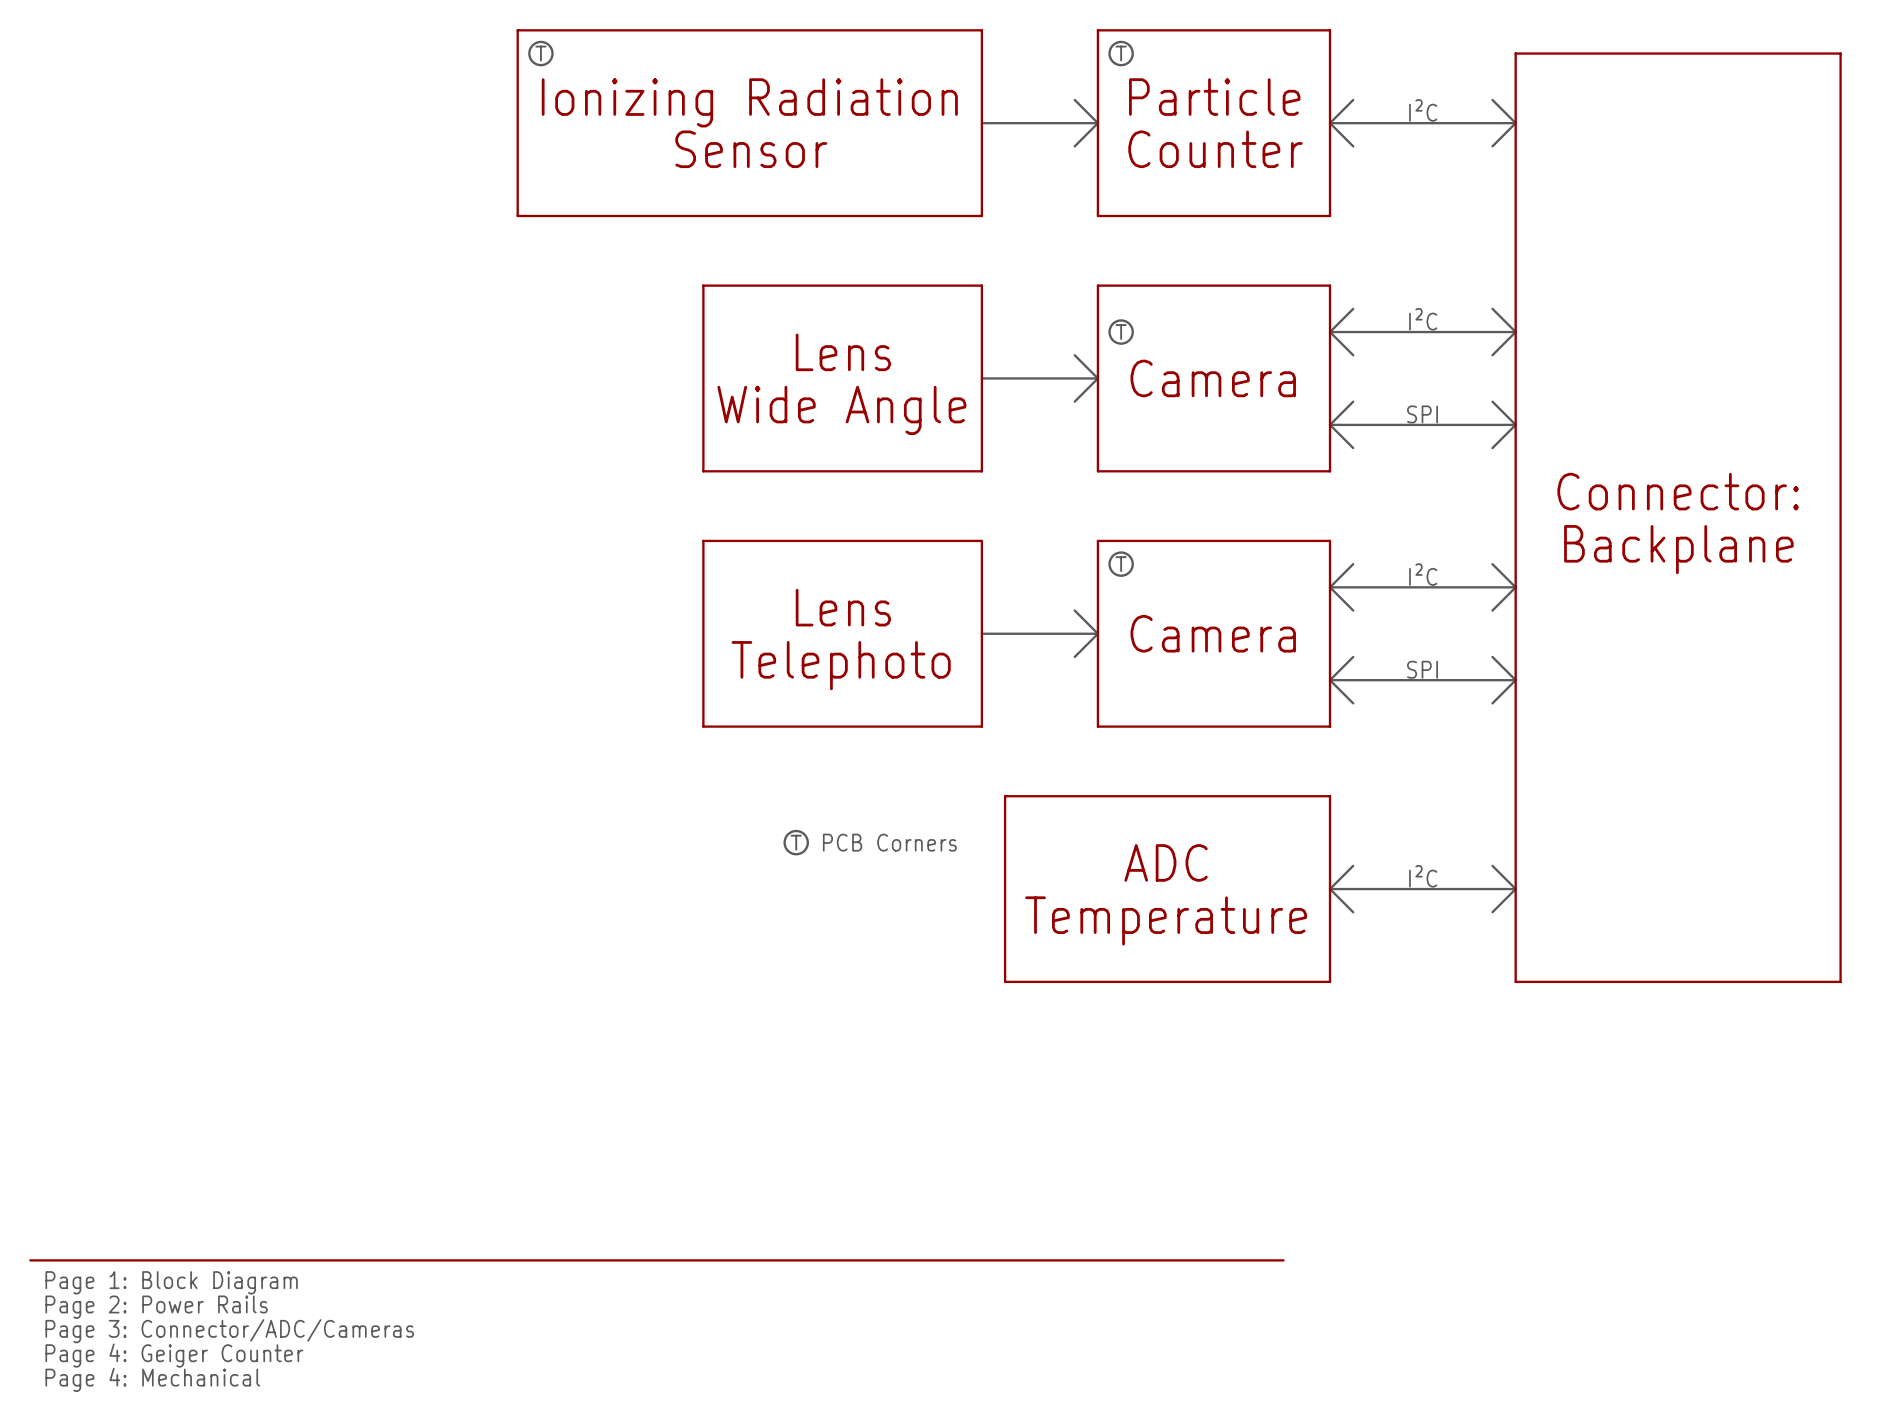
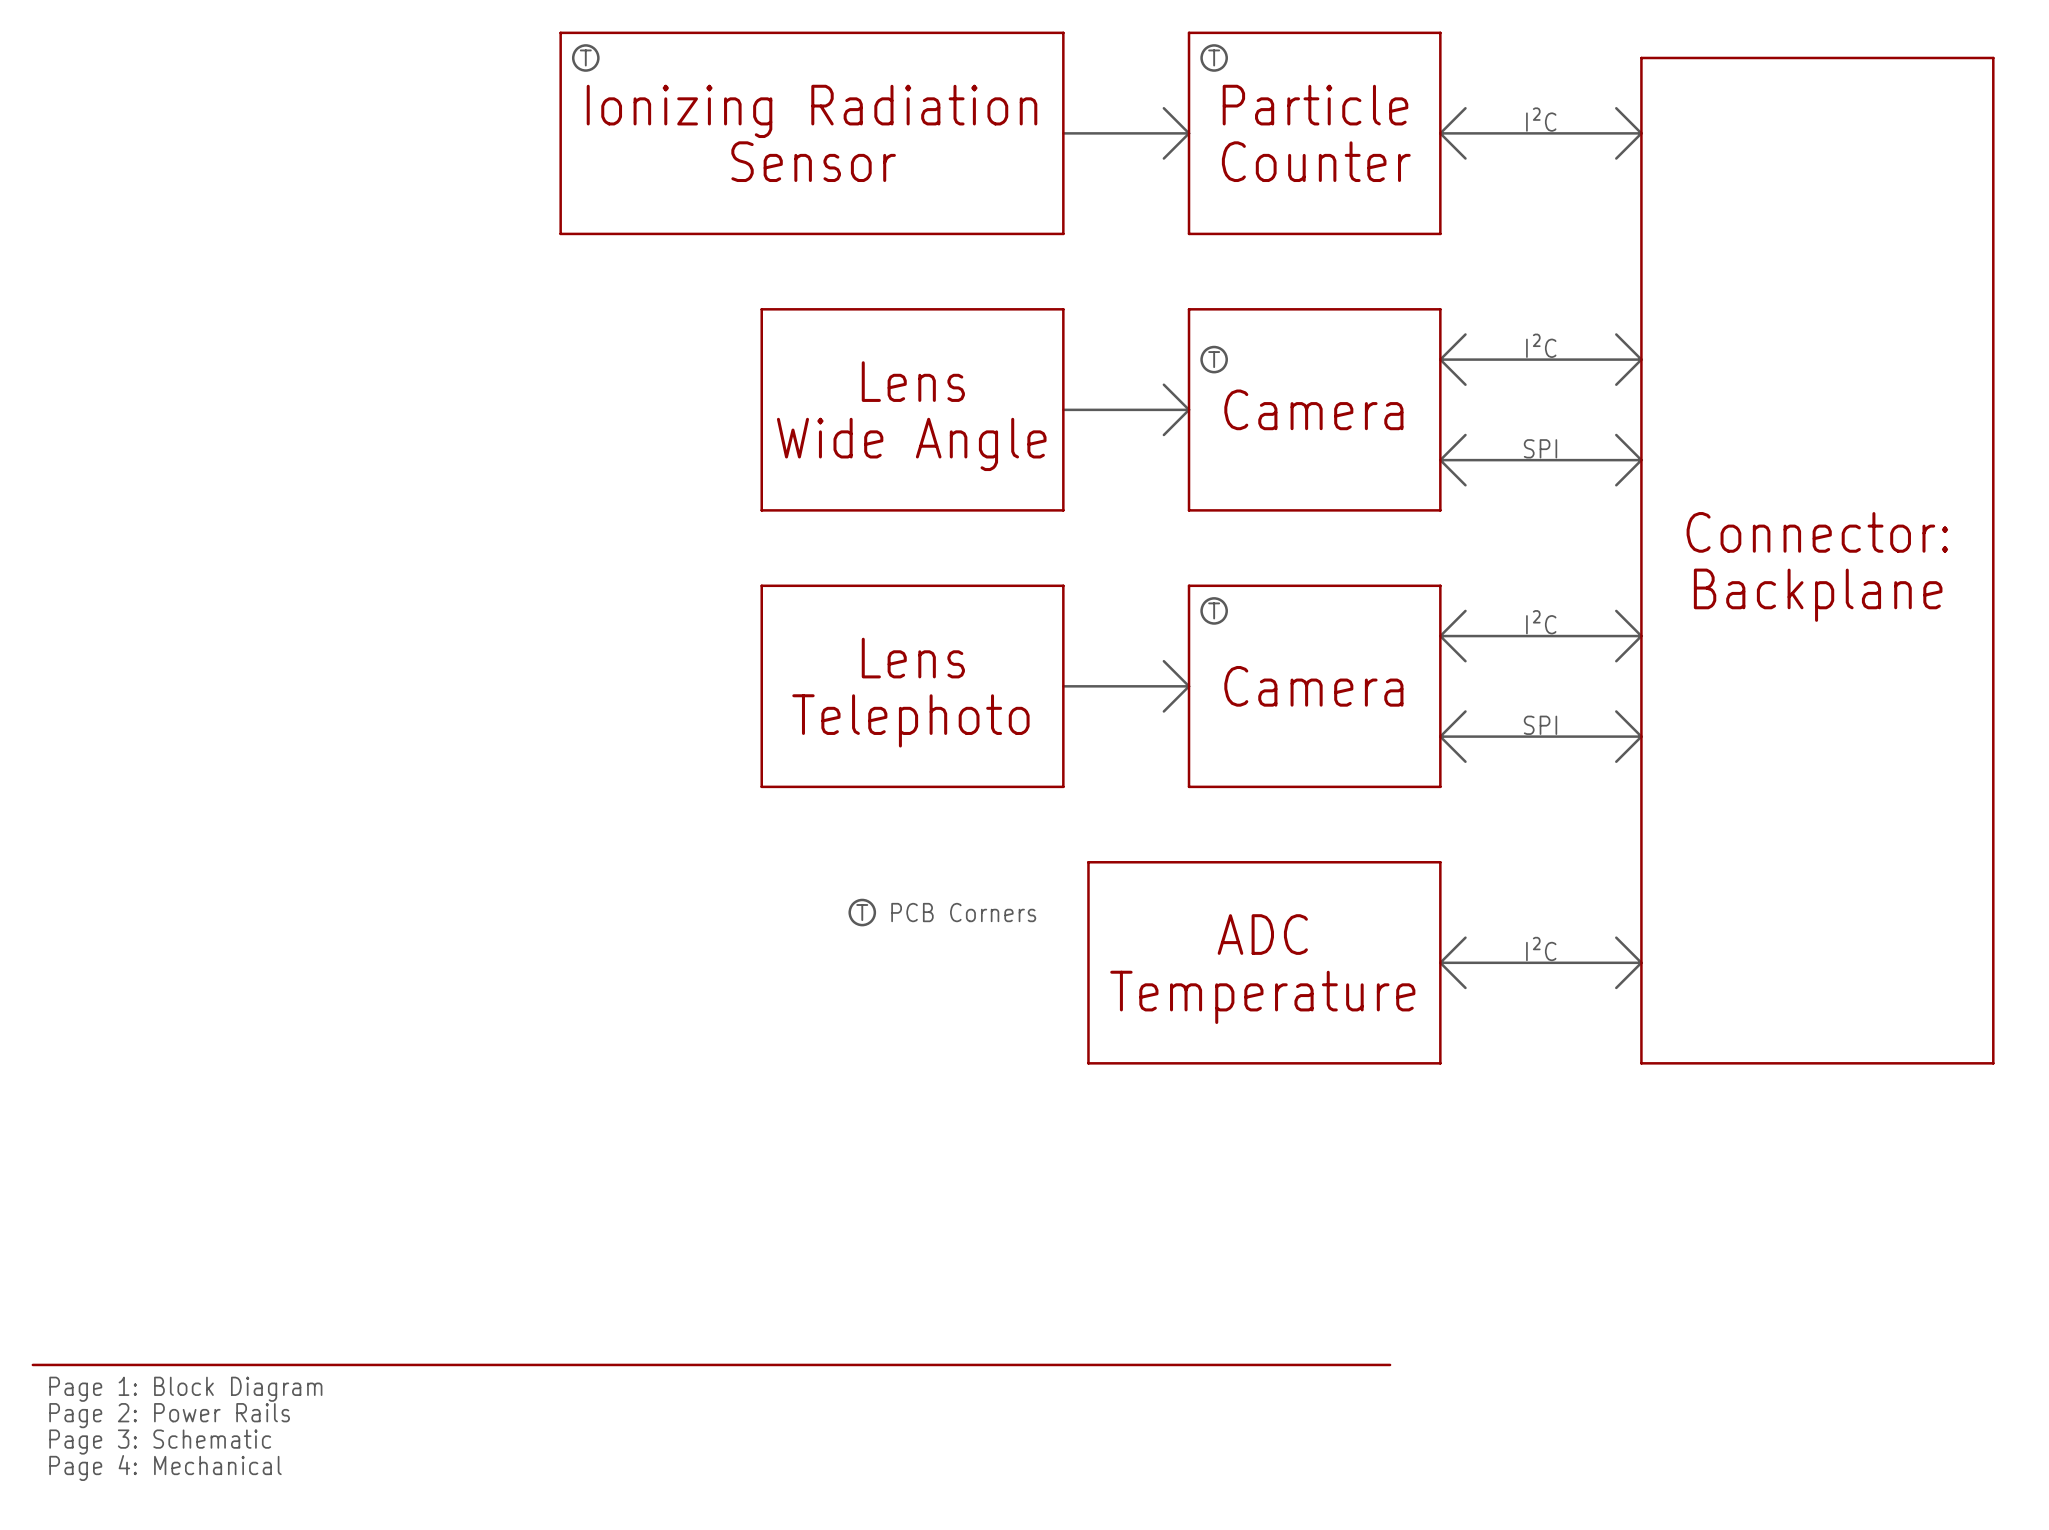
text: Page 3: Connector/ADC/Cameras (229, 1331) -> Page 3: Schematic (160, 1442)
text: Page 4: Geiger Counter (174, 1355) -> Page 4: Mechanical (165, 1468)
text: Page 4: Mechanical (152, 1379) -> none

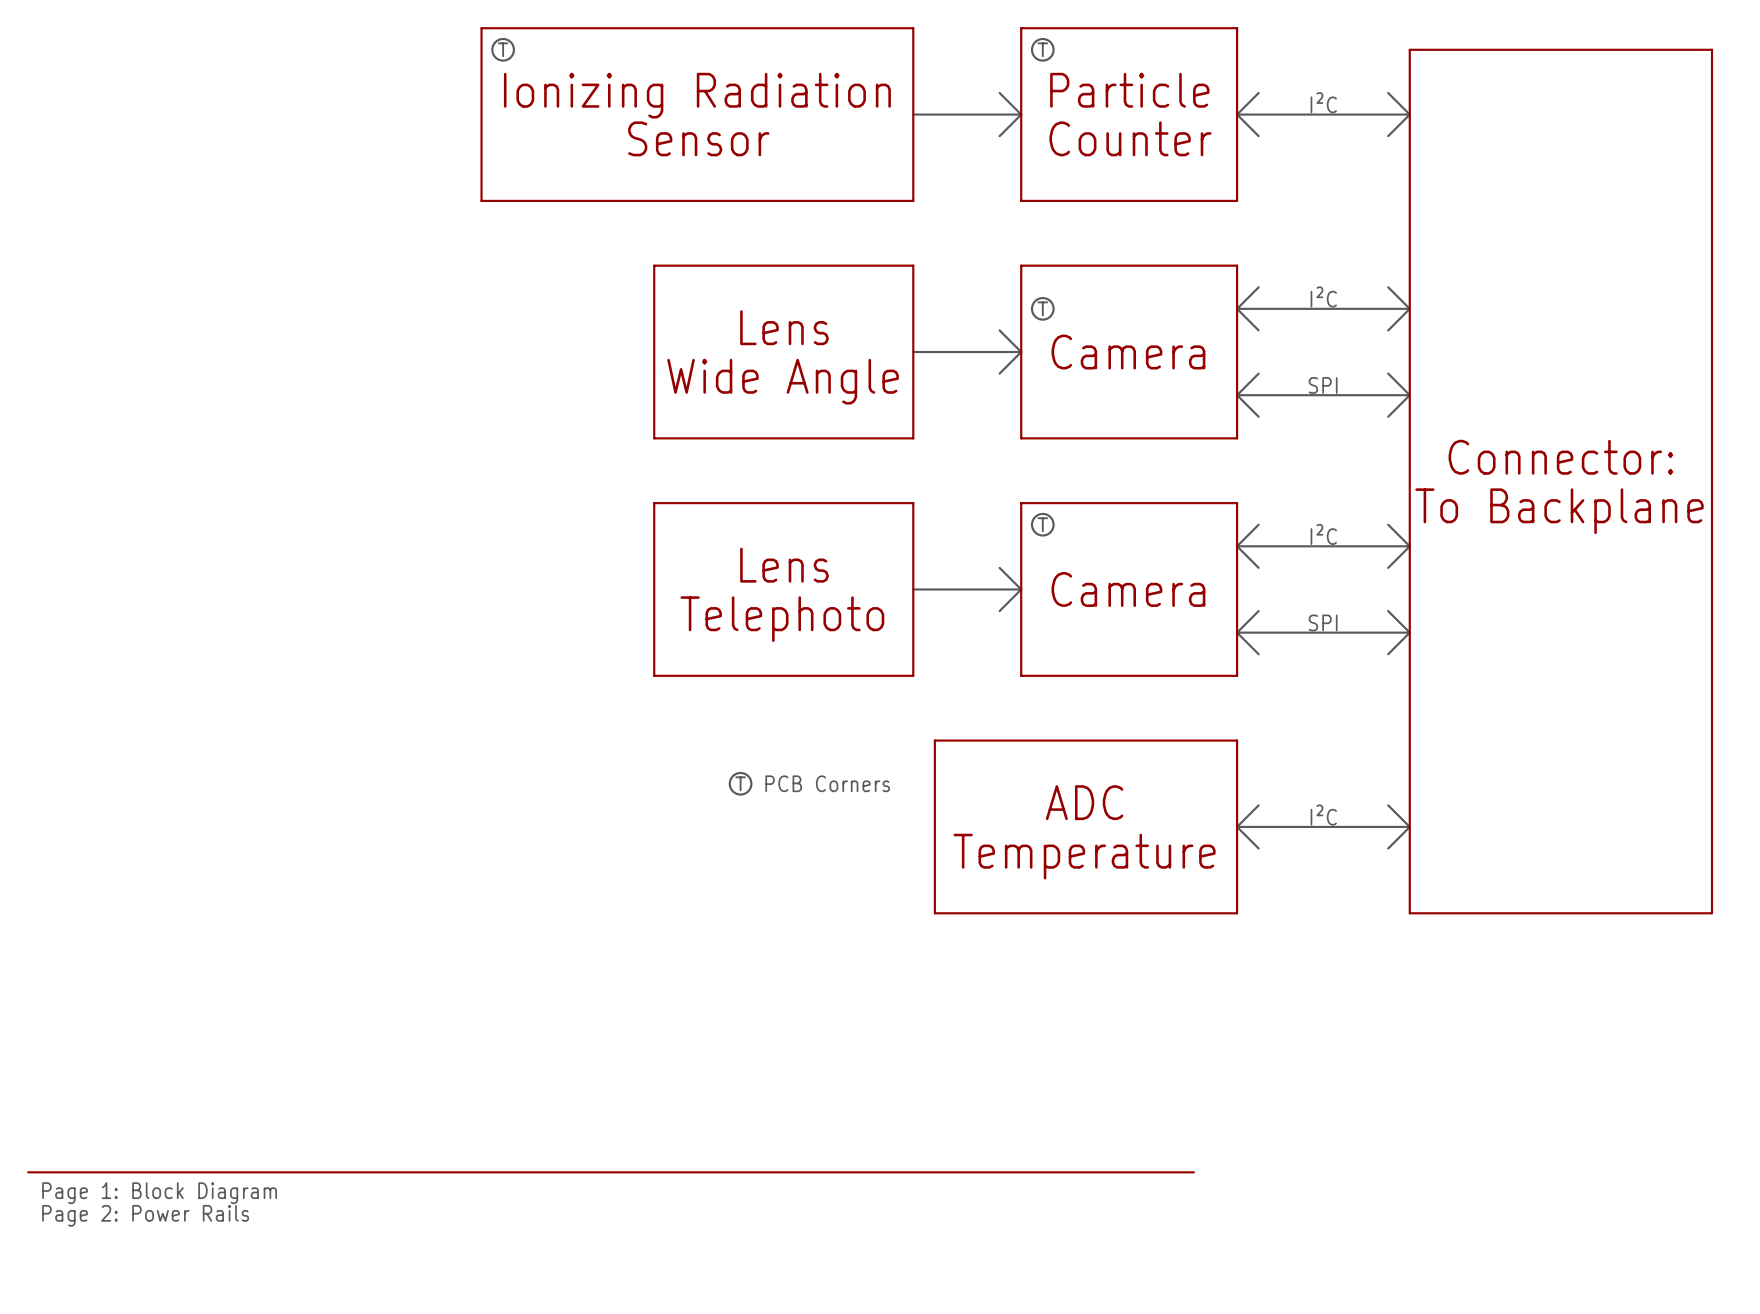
text: Backplane (1818, 595) -> To Backplane (1559, 511)
text: Page 3: Schematic (160, 1442) -> none
text: Page 4: Mechanical (165, 1468) -> none

